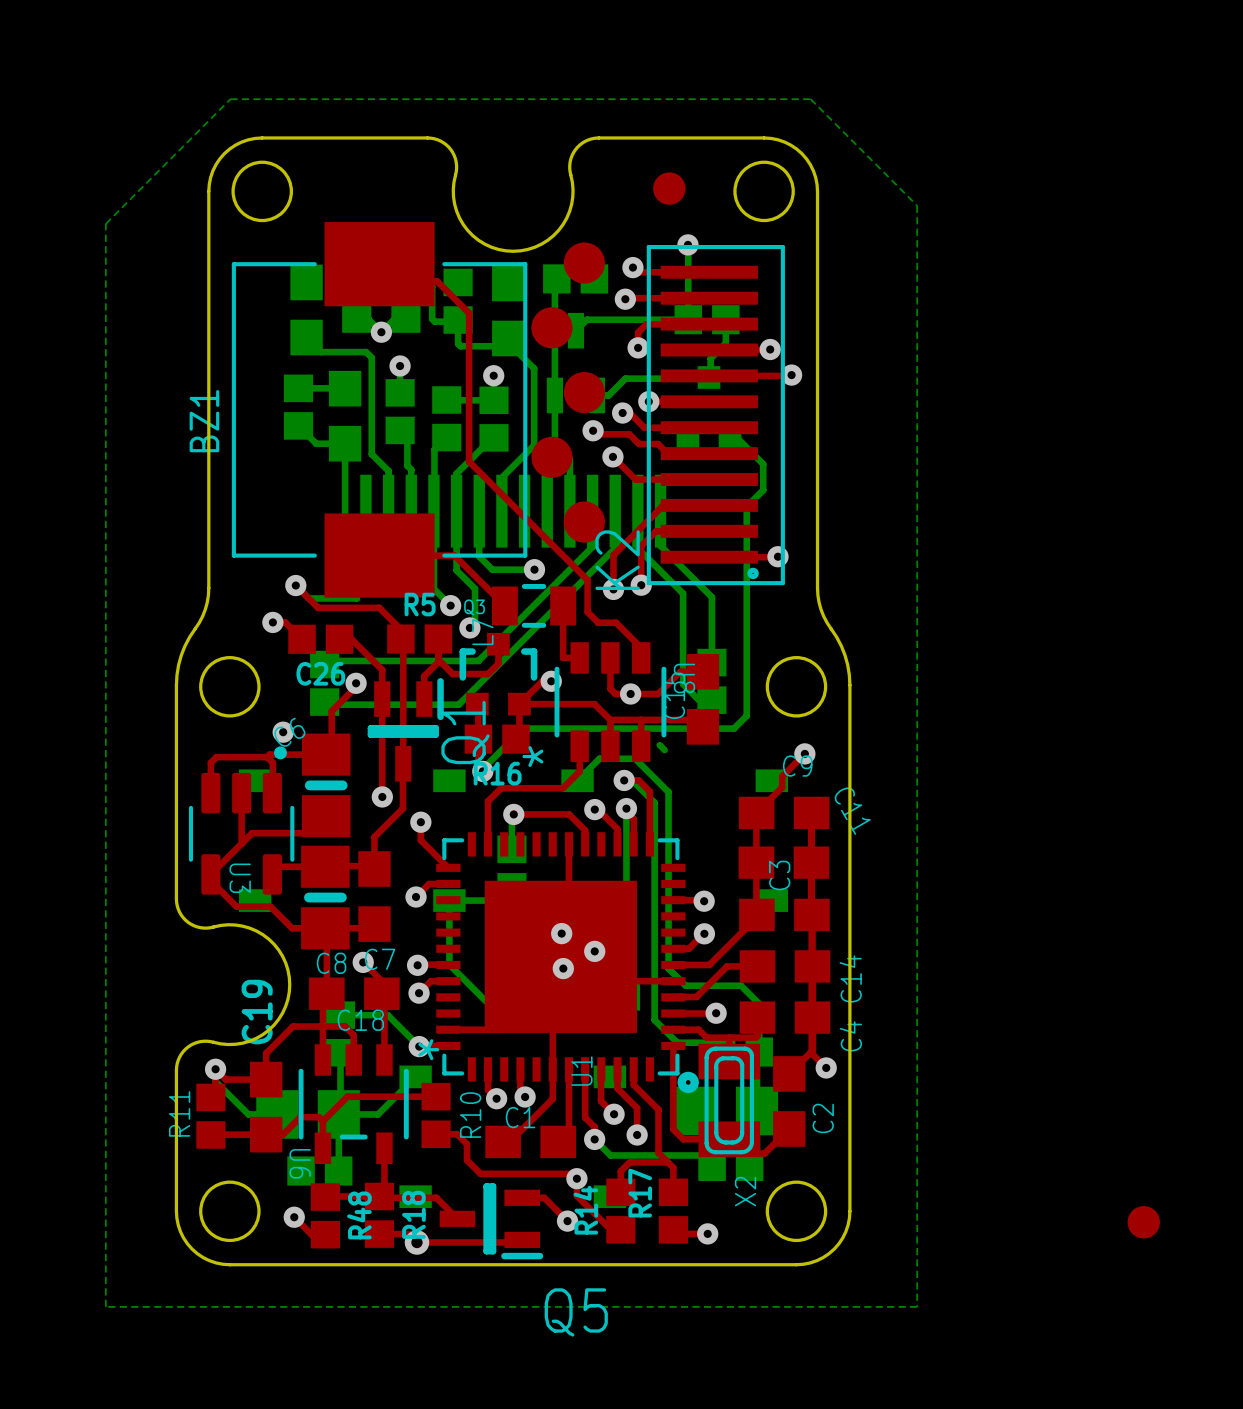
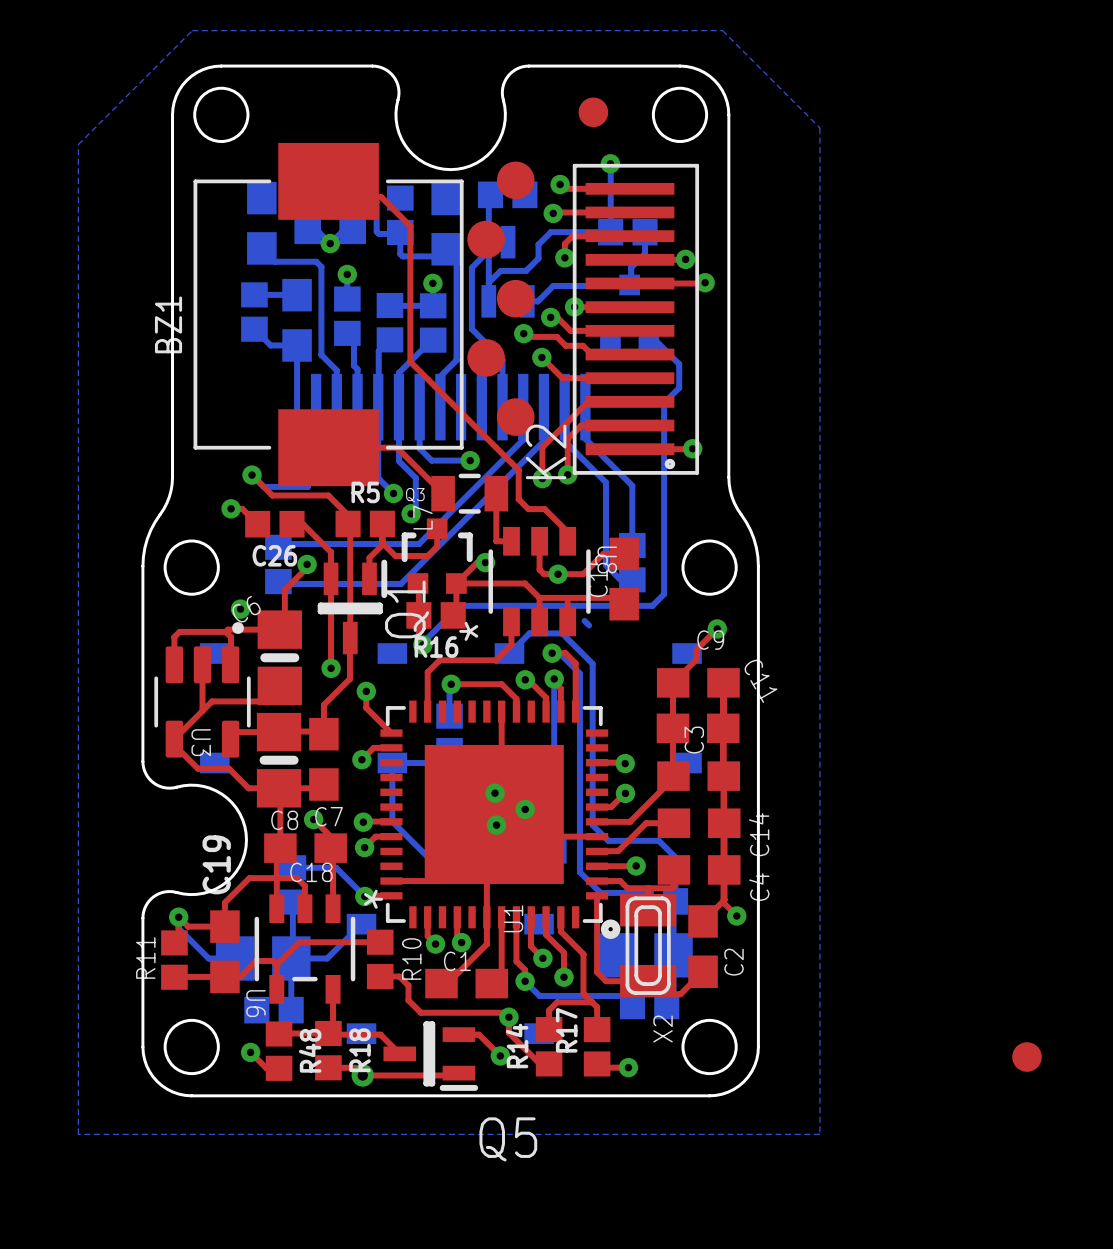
bottom track: (622, 319) (586, 319) (575, 330) -> (550, 232) (538, 244) (538, 258) (526, 270) (500, 270) (488, 282)
bottom track: (519, 354) (534, 368) (534, 445) (519, 459) -> (456, 263) (456, 360)
bottom track: (554, 395) (554, 444) -> (507, 242) (497, 242) (471, 267) (471, 329) (488, 346)

